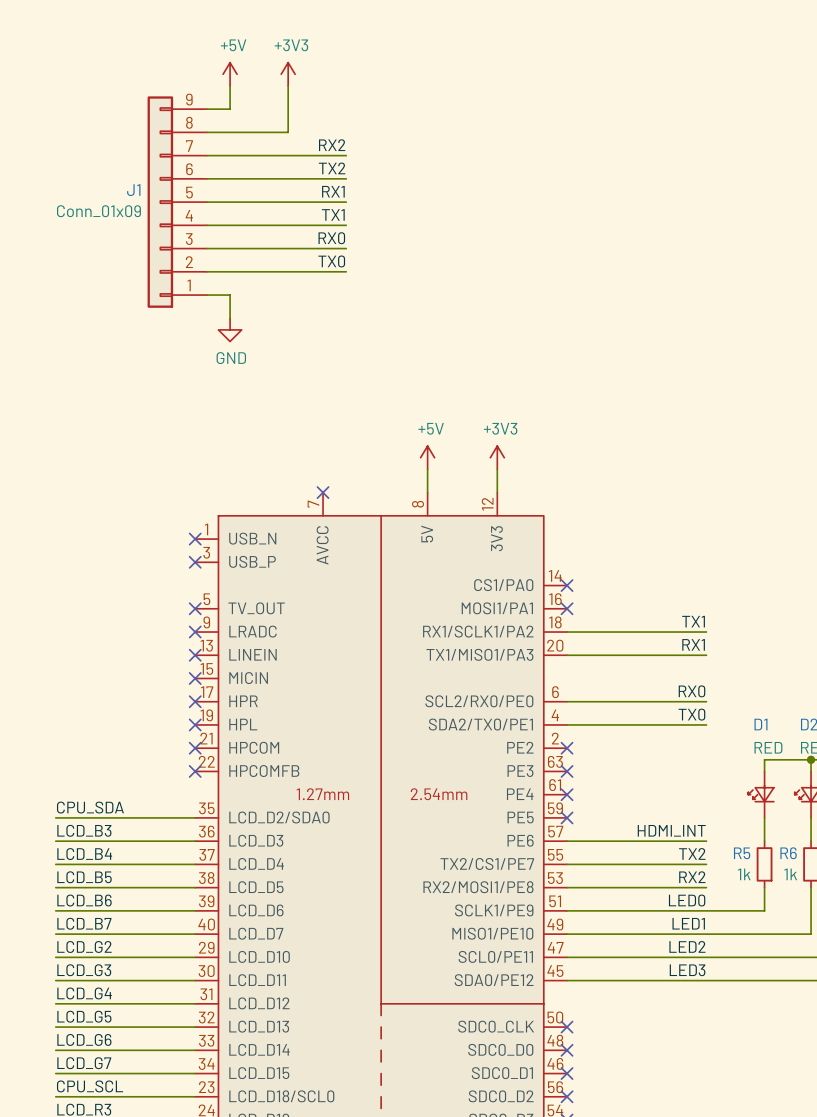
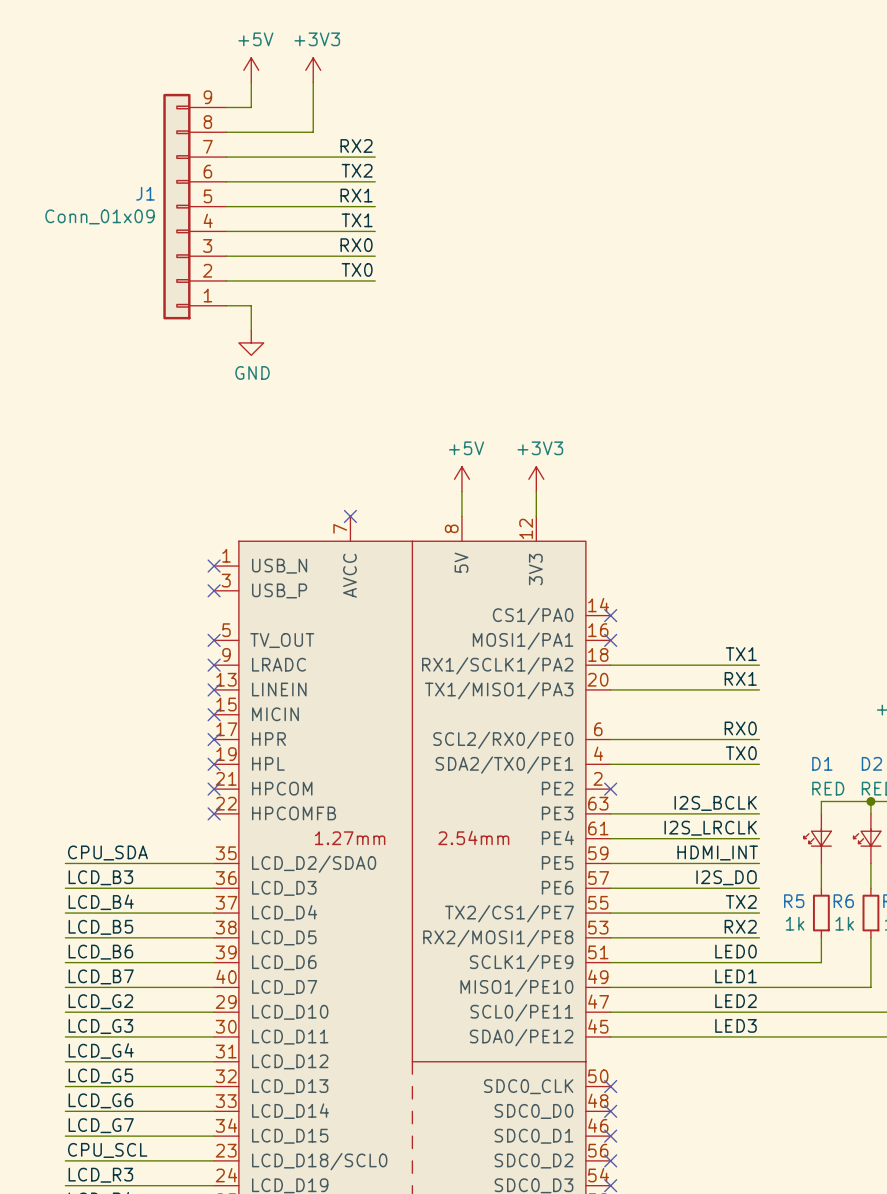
label: none -> I2S_BCLK (715, 803)
wire: none -> (610, 813) (759, 813)
no-connect mark: (567, 771) -> none
label: none -> I2S_LRCLK (710, 828)
wire: none -> (610, 838) (759, 838)
no-connect mark: (567, 794) -> none
label: none -> HDMI_INT (717, 852)
wire: none -> (610, 863) (759, 863)
no-connect mark: (567, 817) -> none
label: HDMI_INT (671, 830) -> I2S_DO (726, 877)

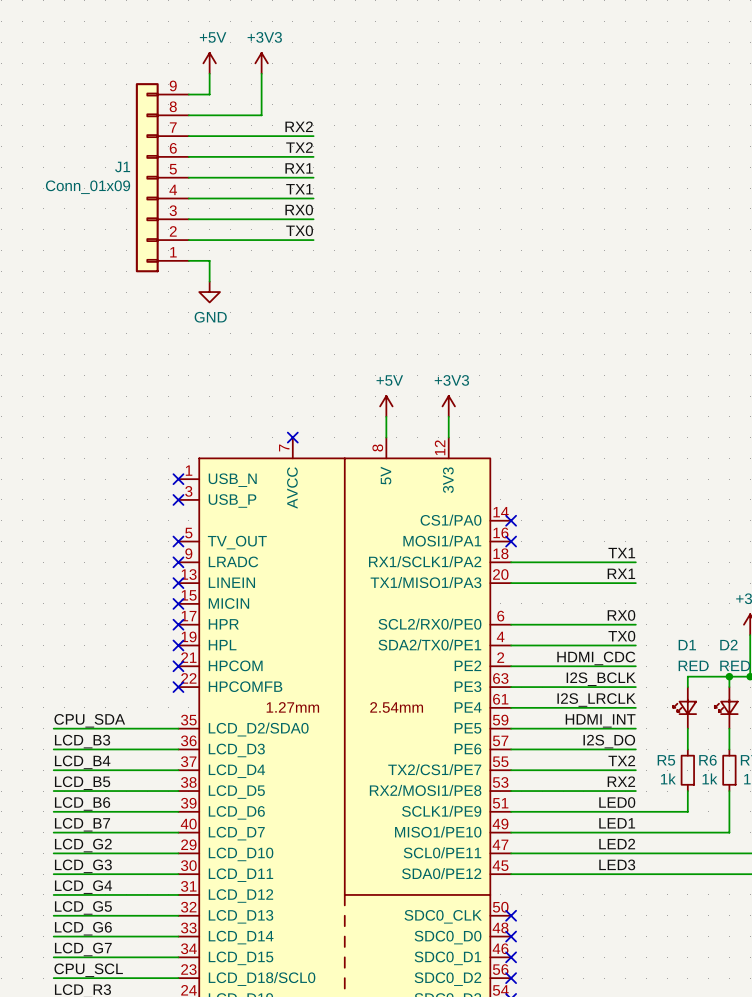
label: none -> HDMI_CDC (596, 658)
wire: none -> (511, 666) (635, 666)
no-connect mark: (610, 789) -> none

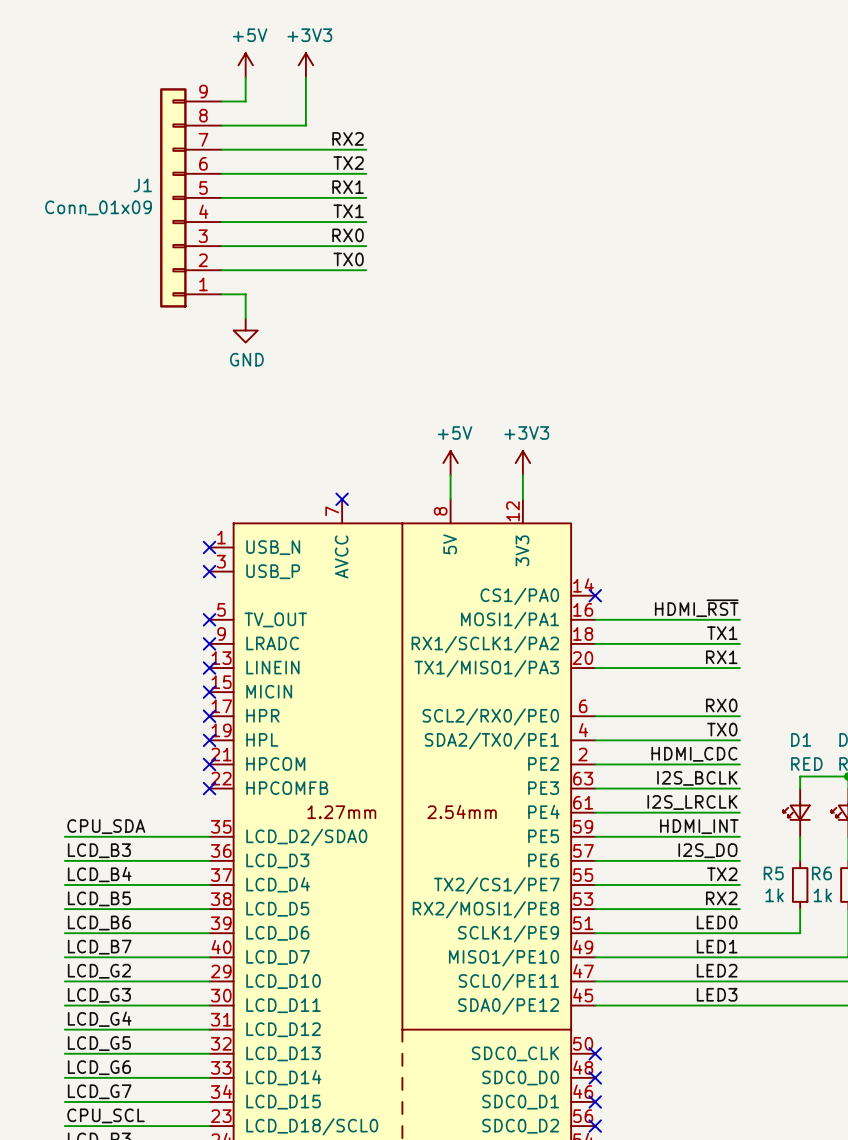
label: none -> HDMI_~{RST} (696, 608)
wire: none -> (595, 619) (739, 619)
no-connect mark: (511, 541) -> none

